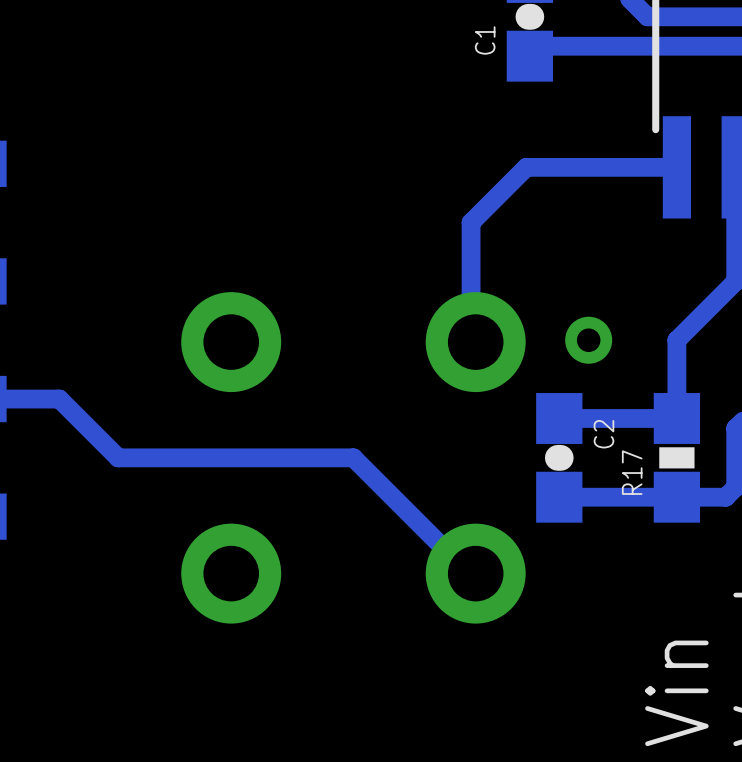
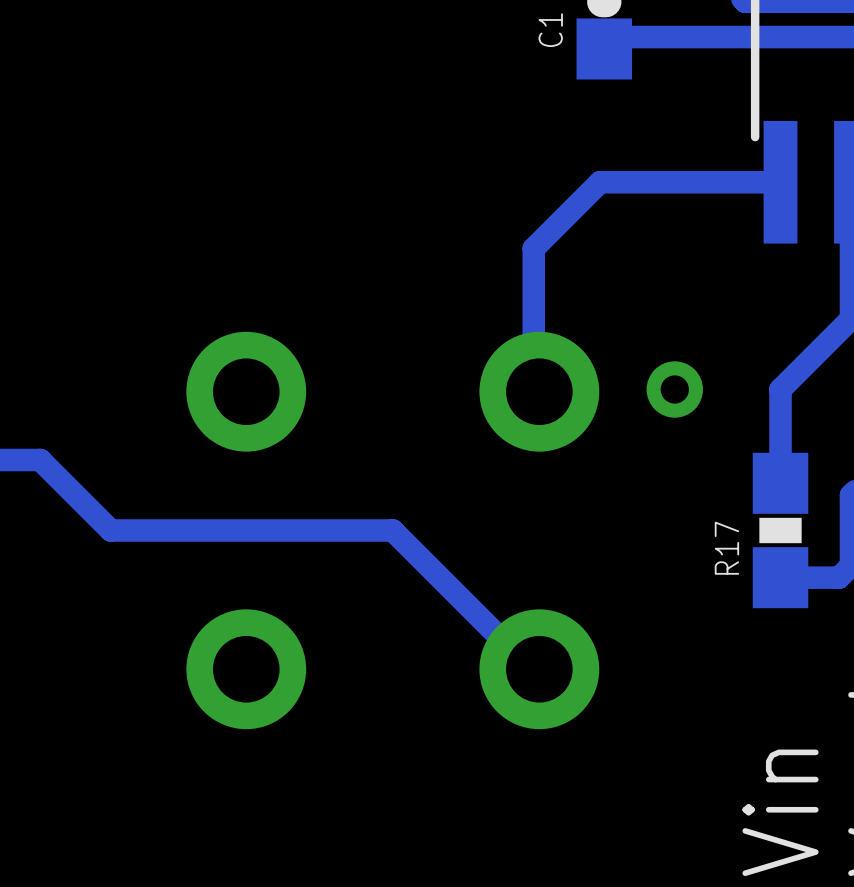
track: (676, 418) (559, 418) -> none
C2: (559, 457) -> none
track: (675, 497) (559, 497) -> none

